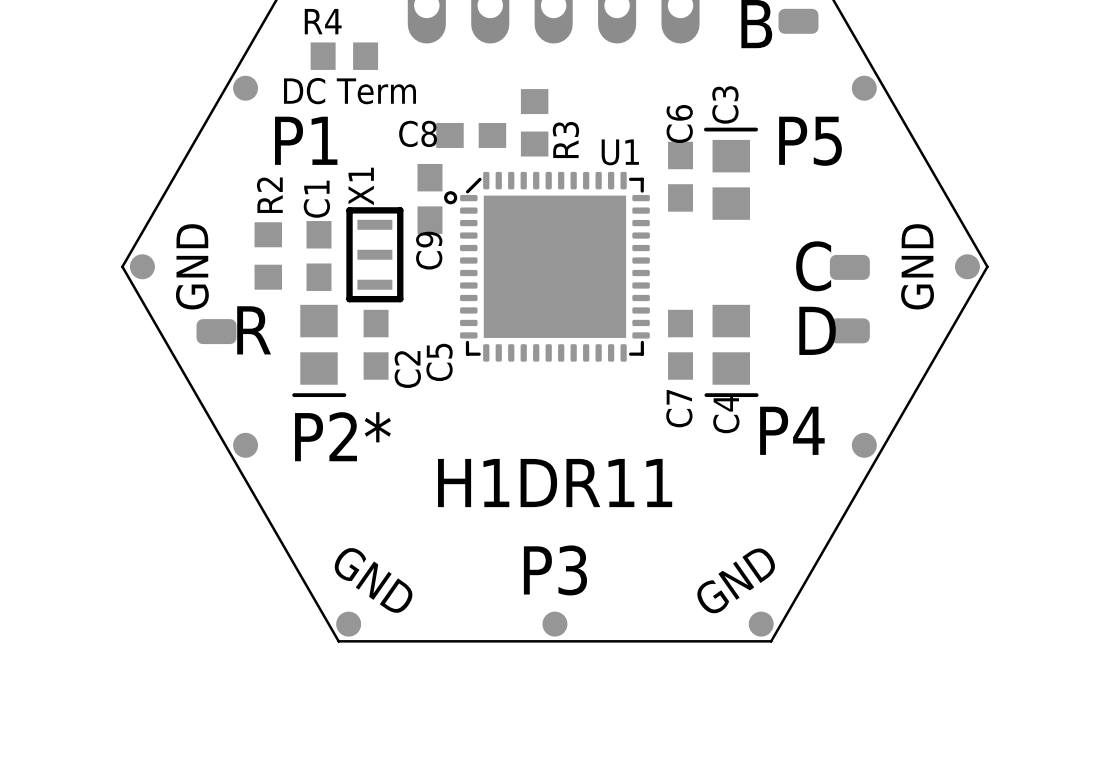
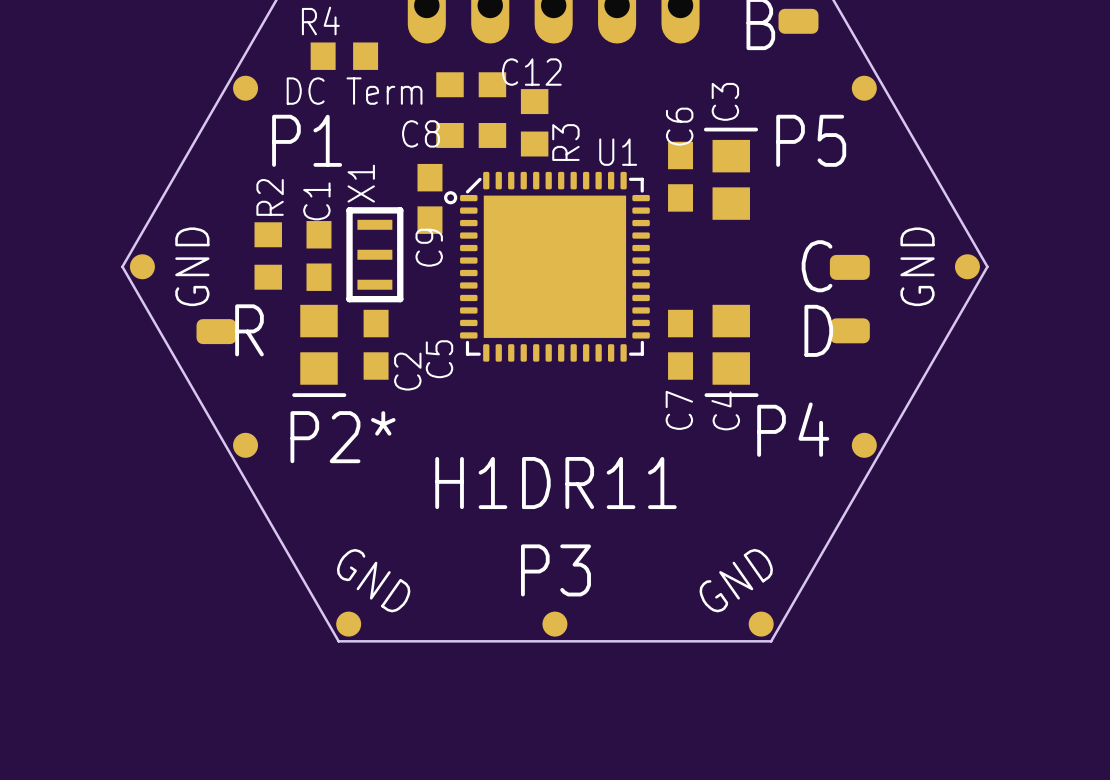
C12: none -> (471, 84)

